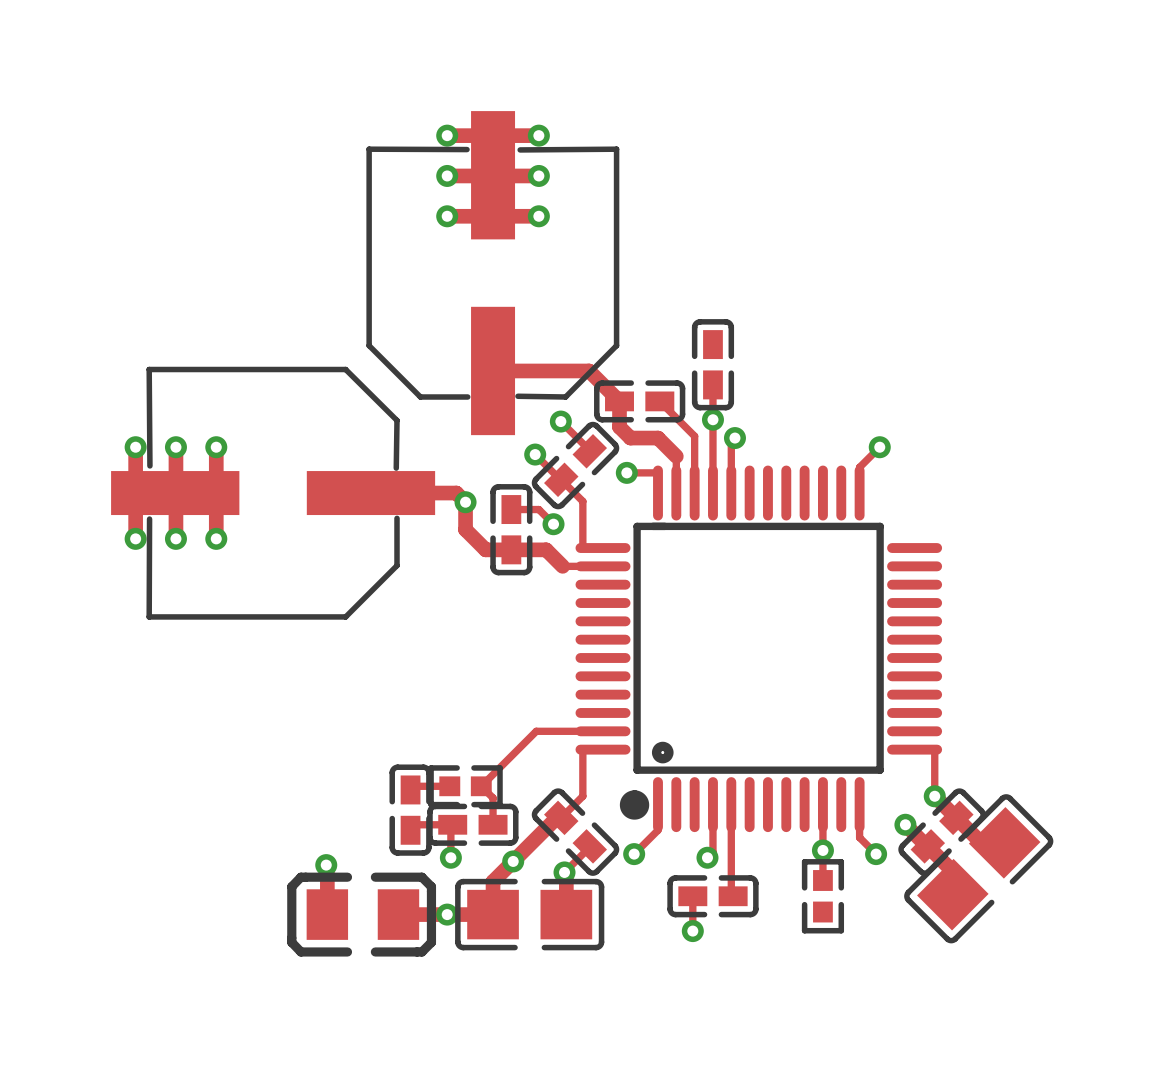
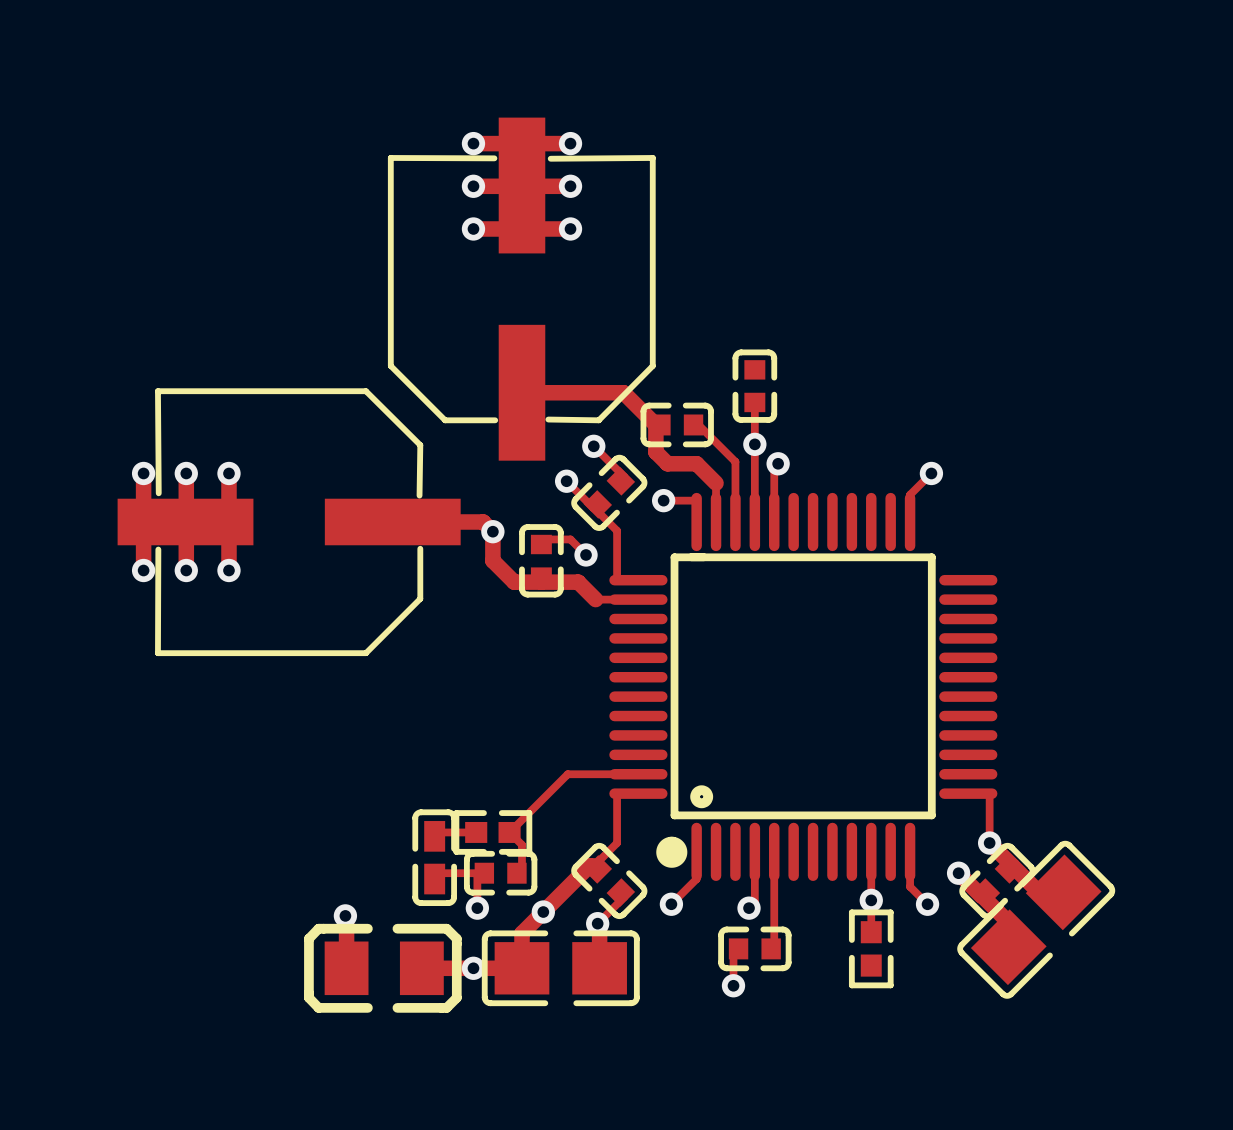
part footprint: [691, 319, 735, 411] -> [732, 349, 778, 423]
part footprint: [594, 380, 686, 423] -> [640, 402, 714, 448]
part footprint: [531, 421, 620, 510] -> [571, 454, 648, 531]
part footprint: [490, 484, 533, 576] -> [519, 524, 564, 598]
part footprint: [531, 788, 620, 876] -> [571, 842, 648, 920]
part footprint: [898, 788, 986, 876] -> [959, 842, 1036, 920]
part footprint: [427, 803, 519, 846] -> [463, 850, 538, 896]
part footprint: [667, 875, 759, 918] -> [718, 926, 792, 972]

